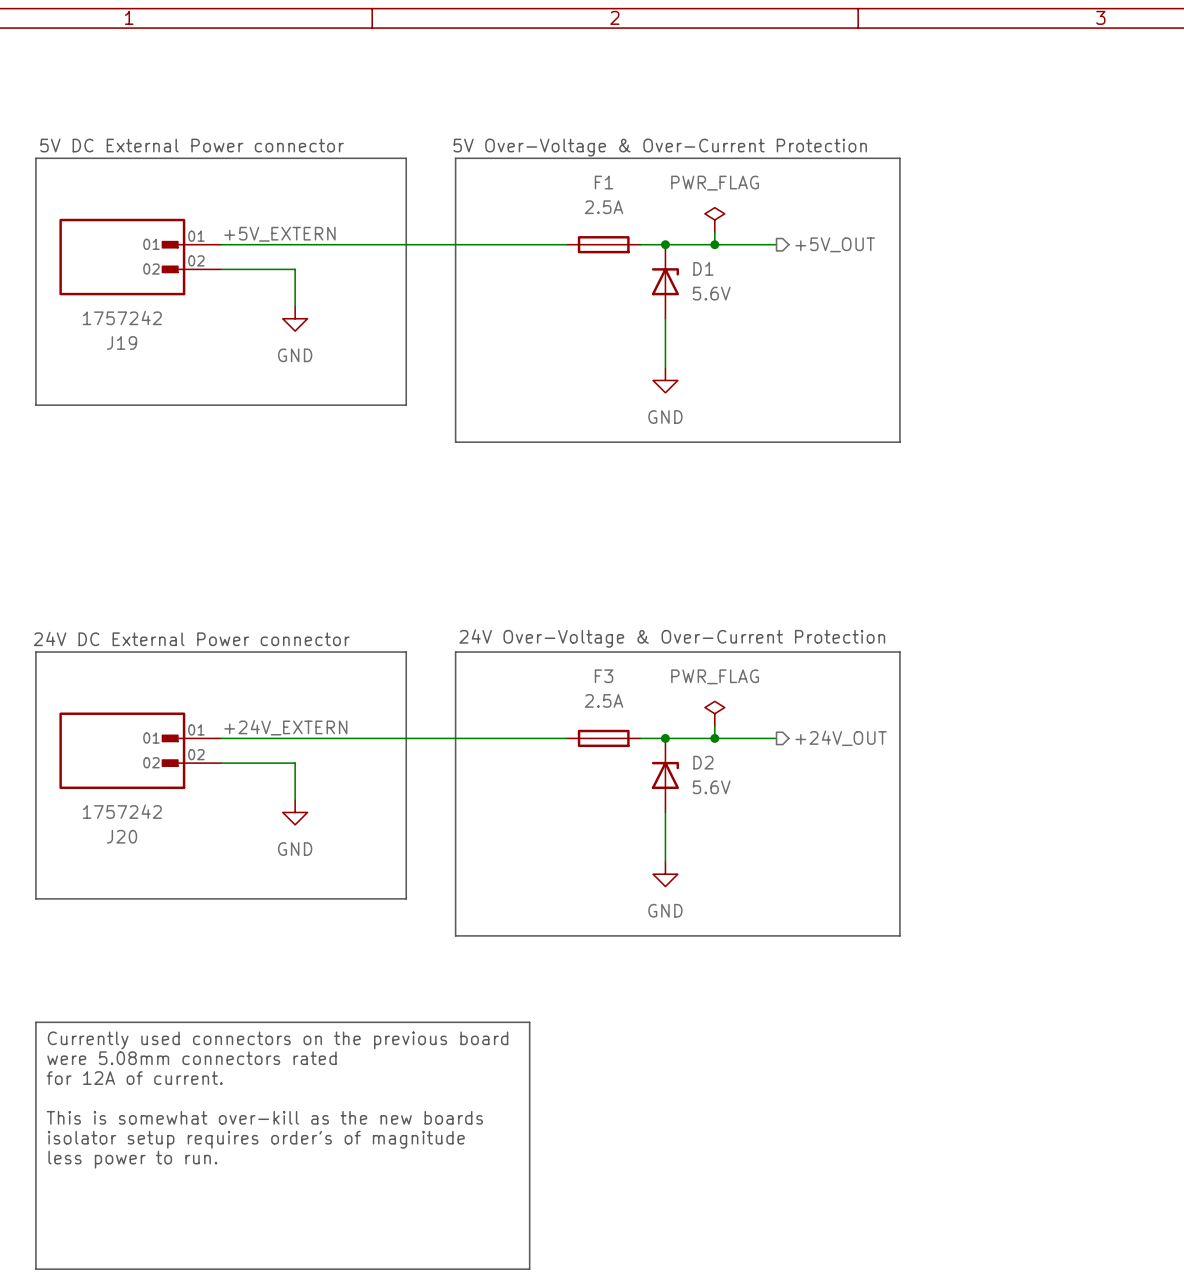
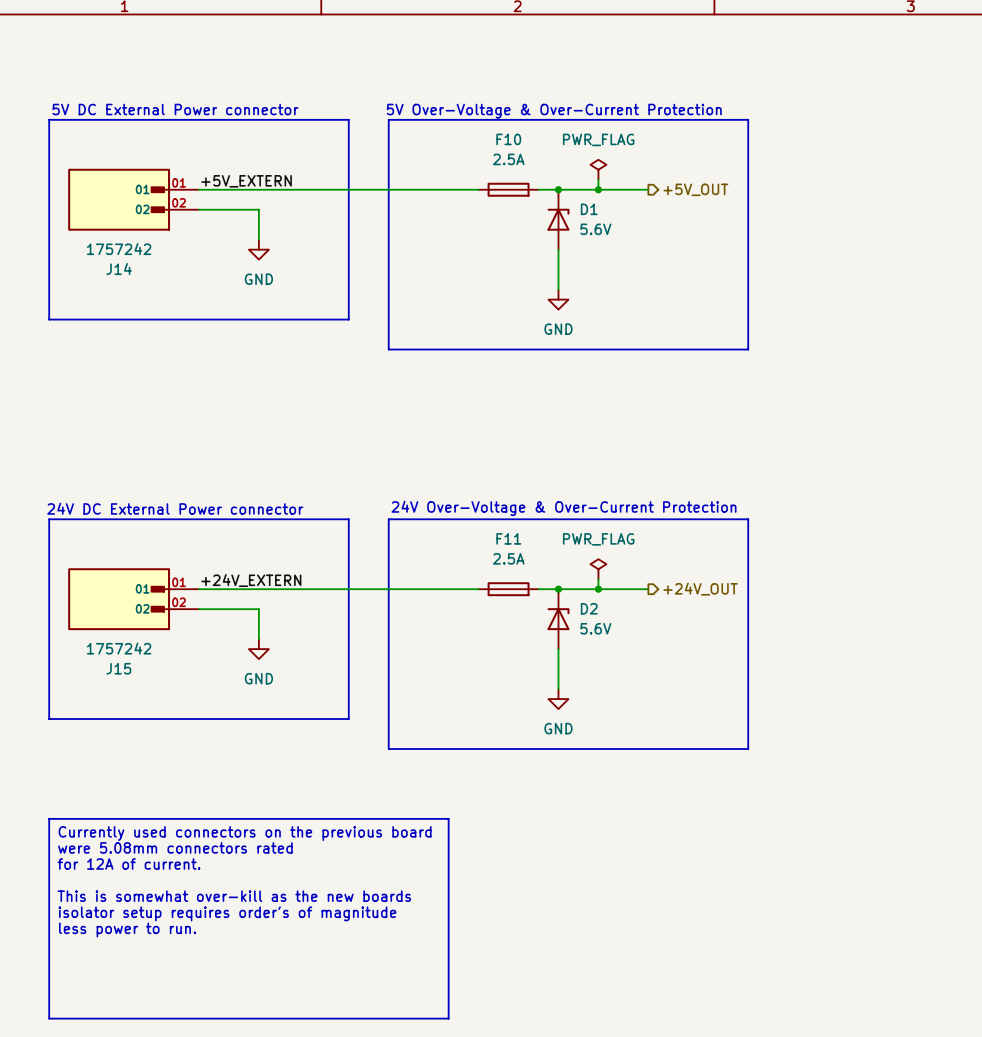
F1 name: F1 (604, 182) -> F10 (508, 139)
J19 name: J19 (122, 342) -> J14 (119, 269)
F3 name: F3 (604, 676) -> F11 (508, 538)
J20 name: J20 (122, 836) -> J15 (118, 668)

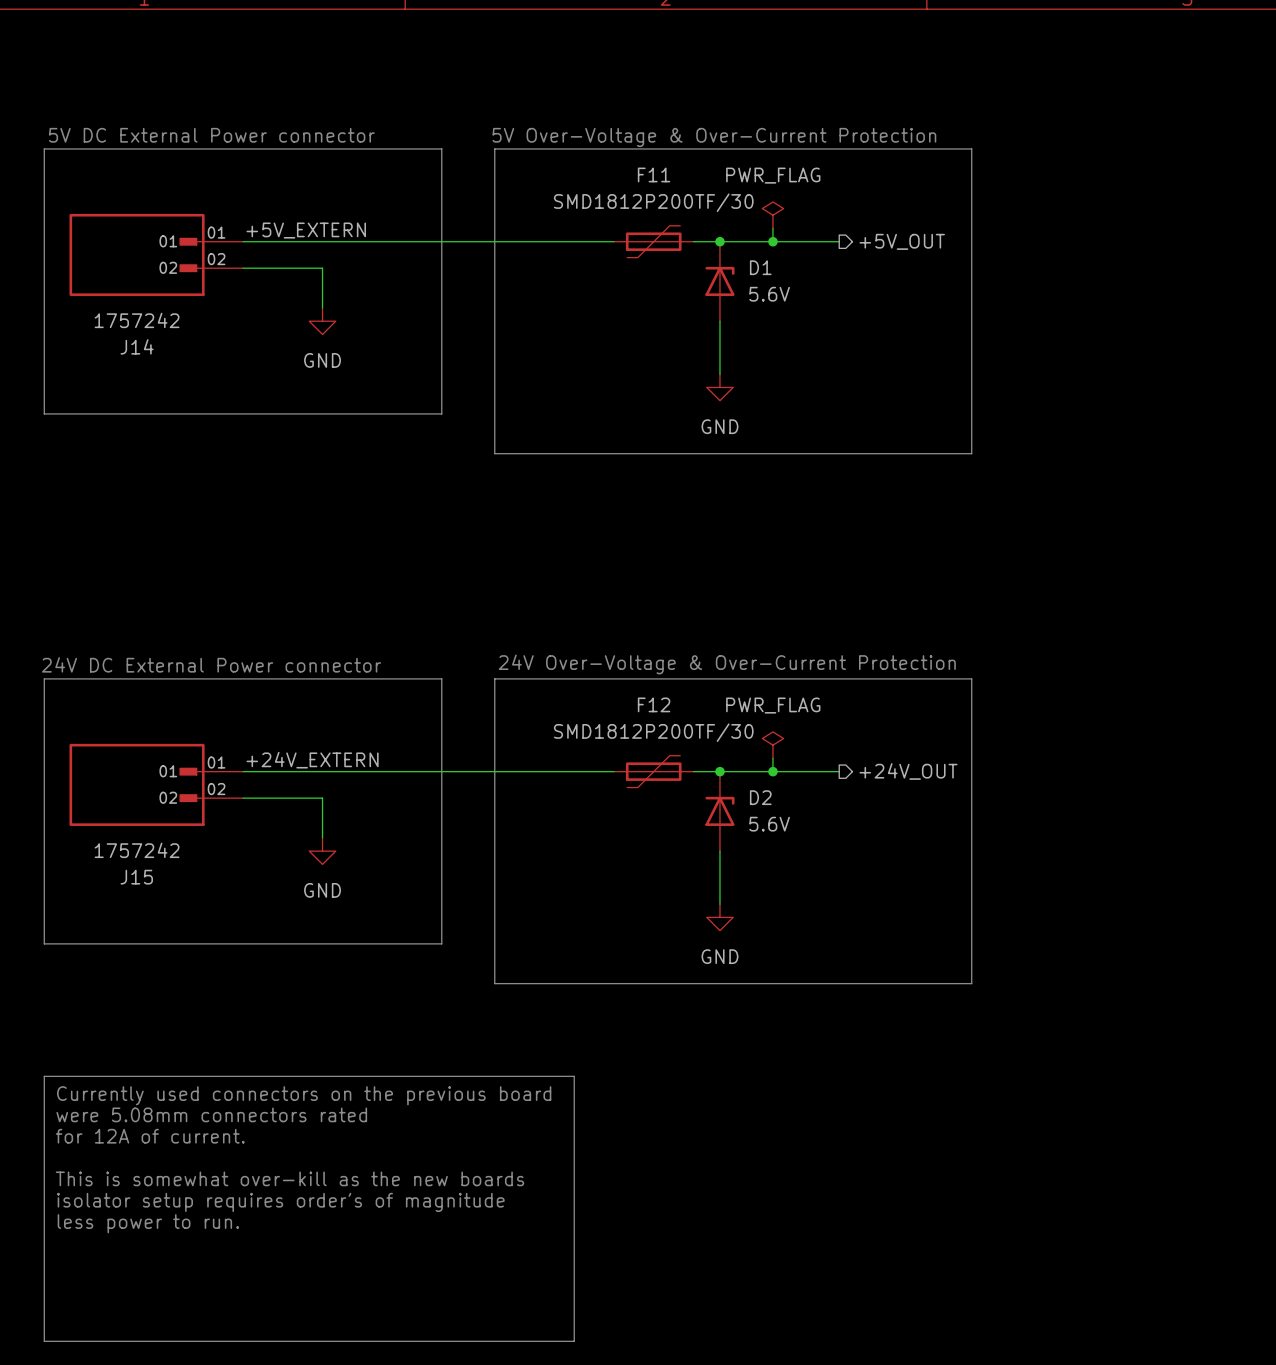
F10: 2.5A (508, 189) -> none
F11 value: 2.5A (508, 558) -> SMD1812P200TF/30 (653, 202)
F11 symbol: [478, 582, 539, 597] -> [613, 225, 694, 258]
F12: none -> SMD1812P200TF/30 (653, 771)

